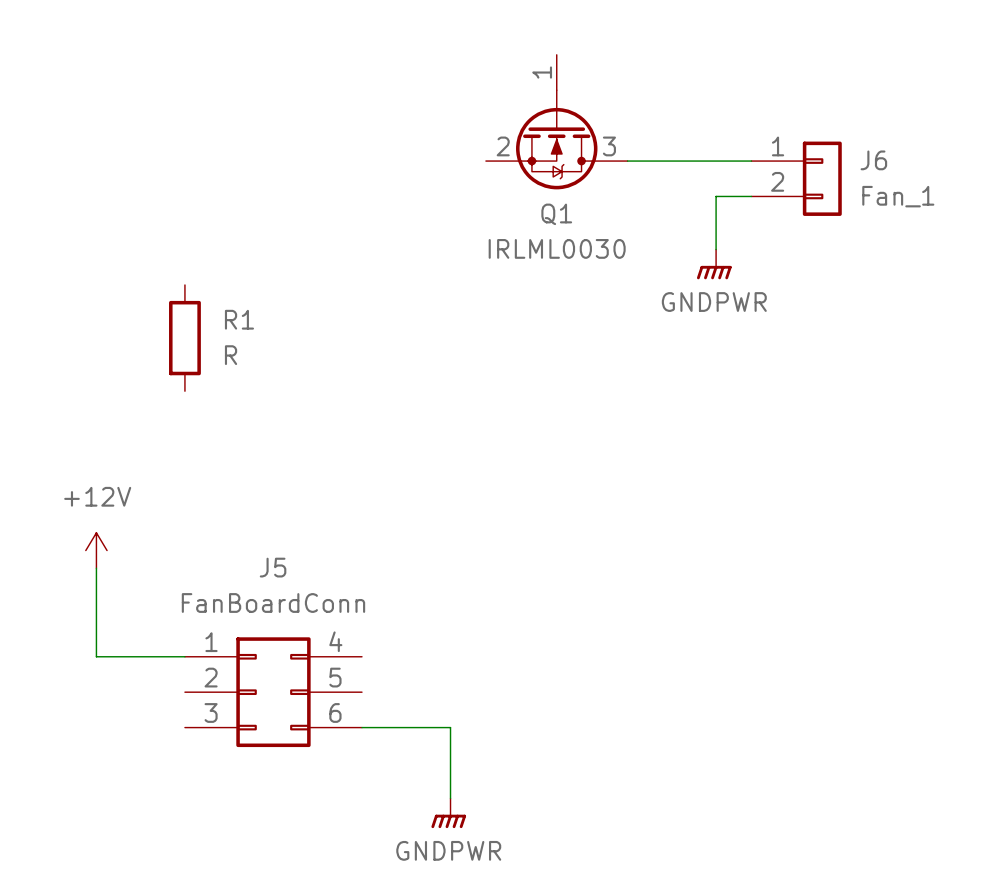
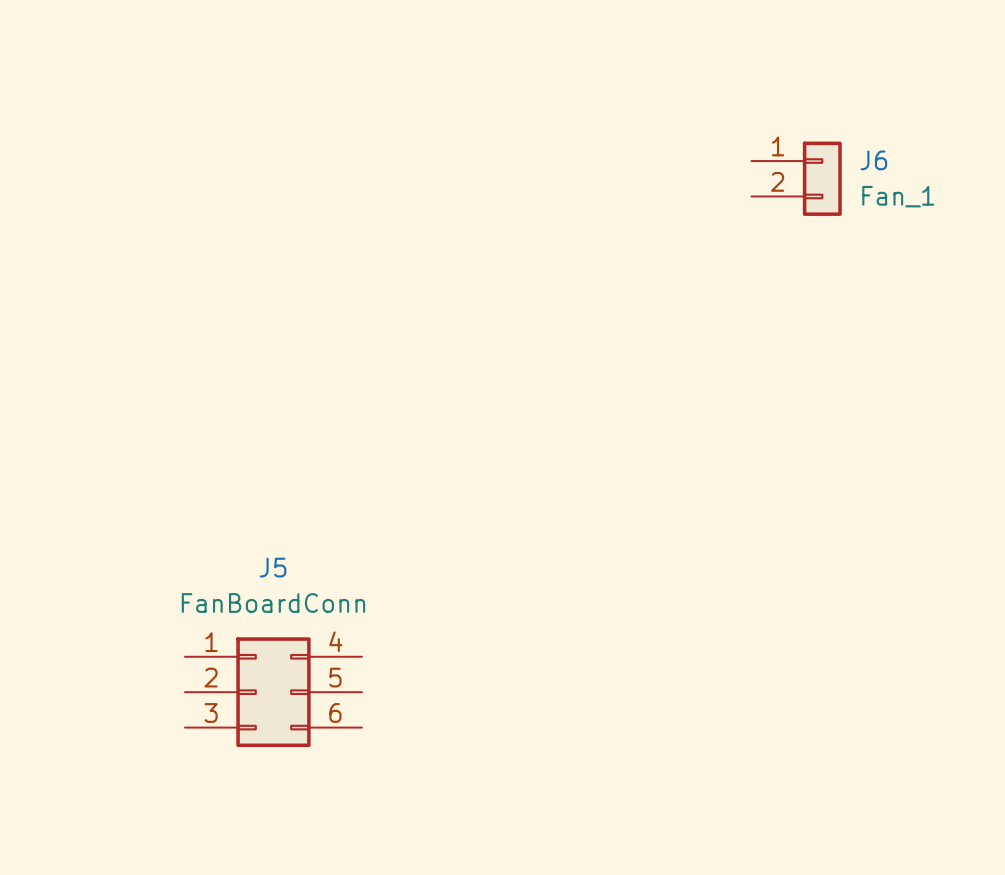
Q1: IRLML0030 (556, 122) -> none
wire: (627, 161) (751, 161) -> none
wire: (751, 196) (716, 196) (716, 249) -> none
power symbol: GNDPWR (714, 264) -> none
R1: R (184, 338) -> none
power symbol: +12V (96, 550) -> none
wire: (96, 568) (96, 656) (184, 656) -> none
wire: (361, 727) (450, 727) (450, 798) -> none
power symbol: GNDPWR (448, 813) -> none

